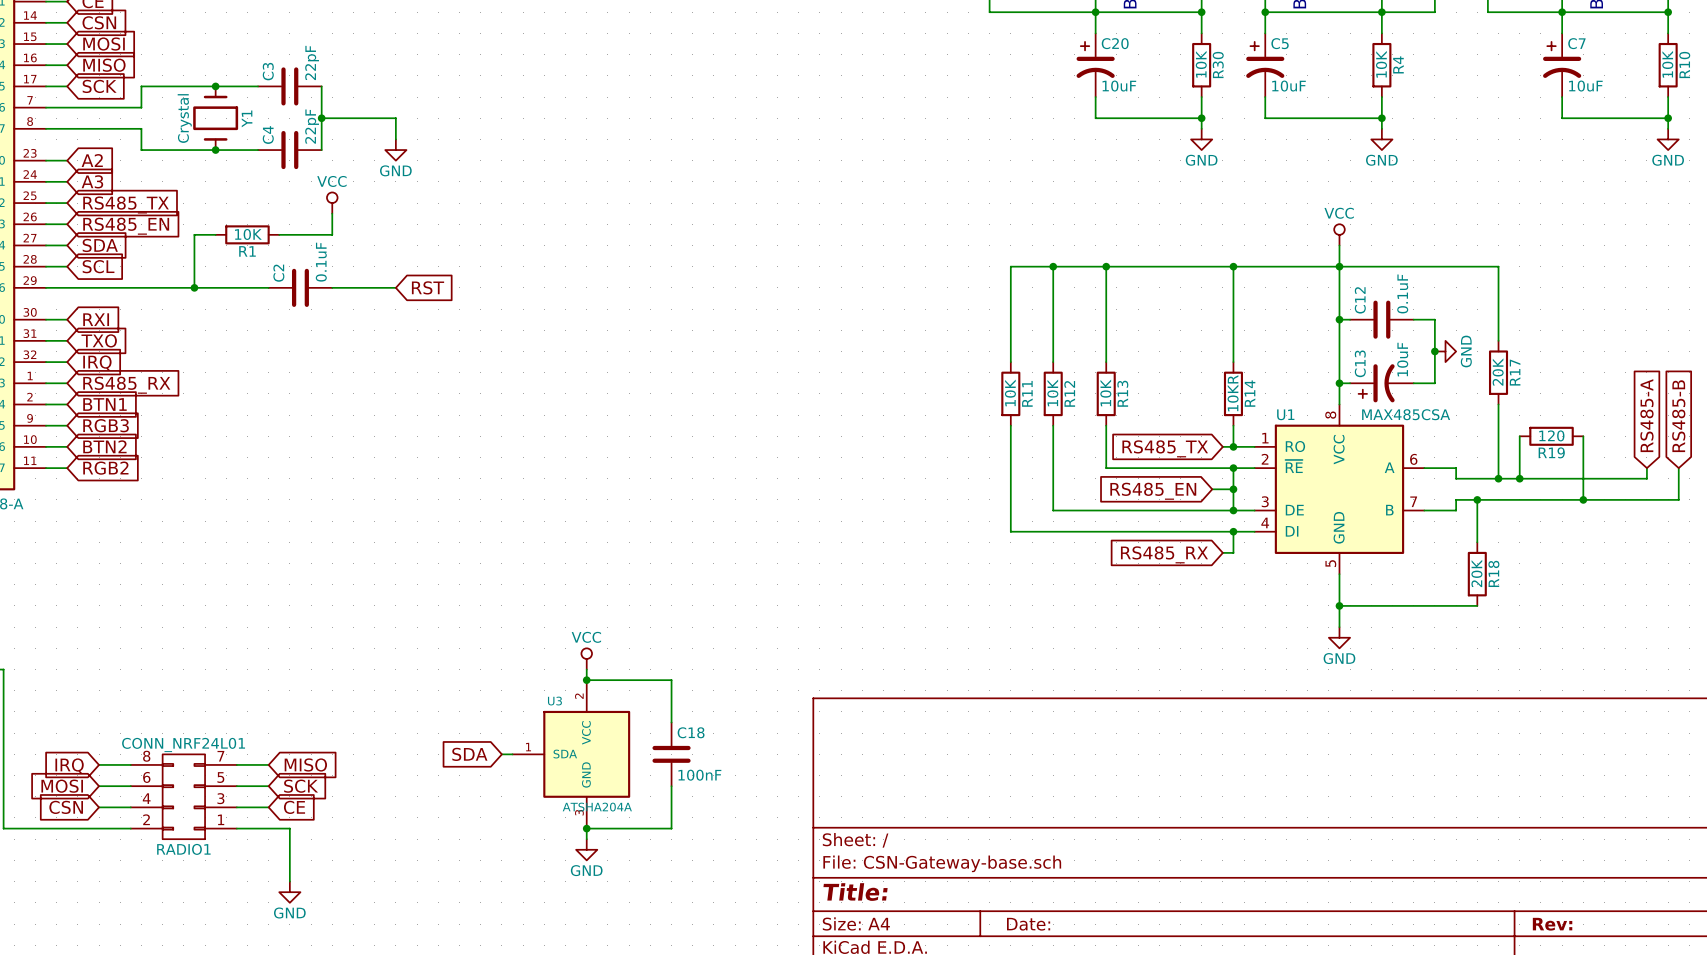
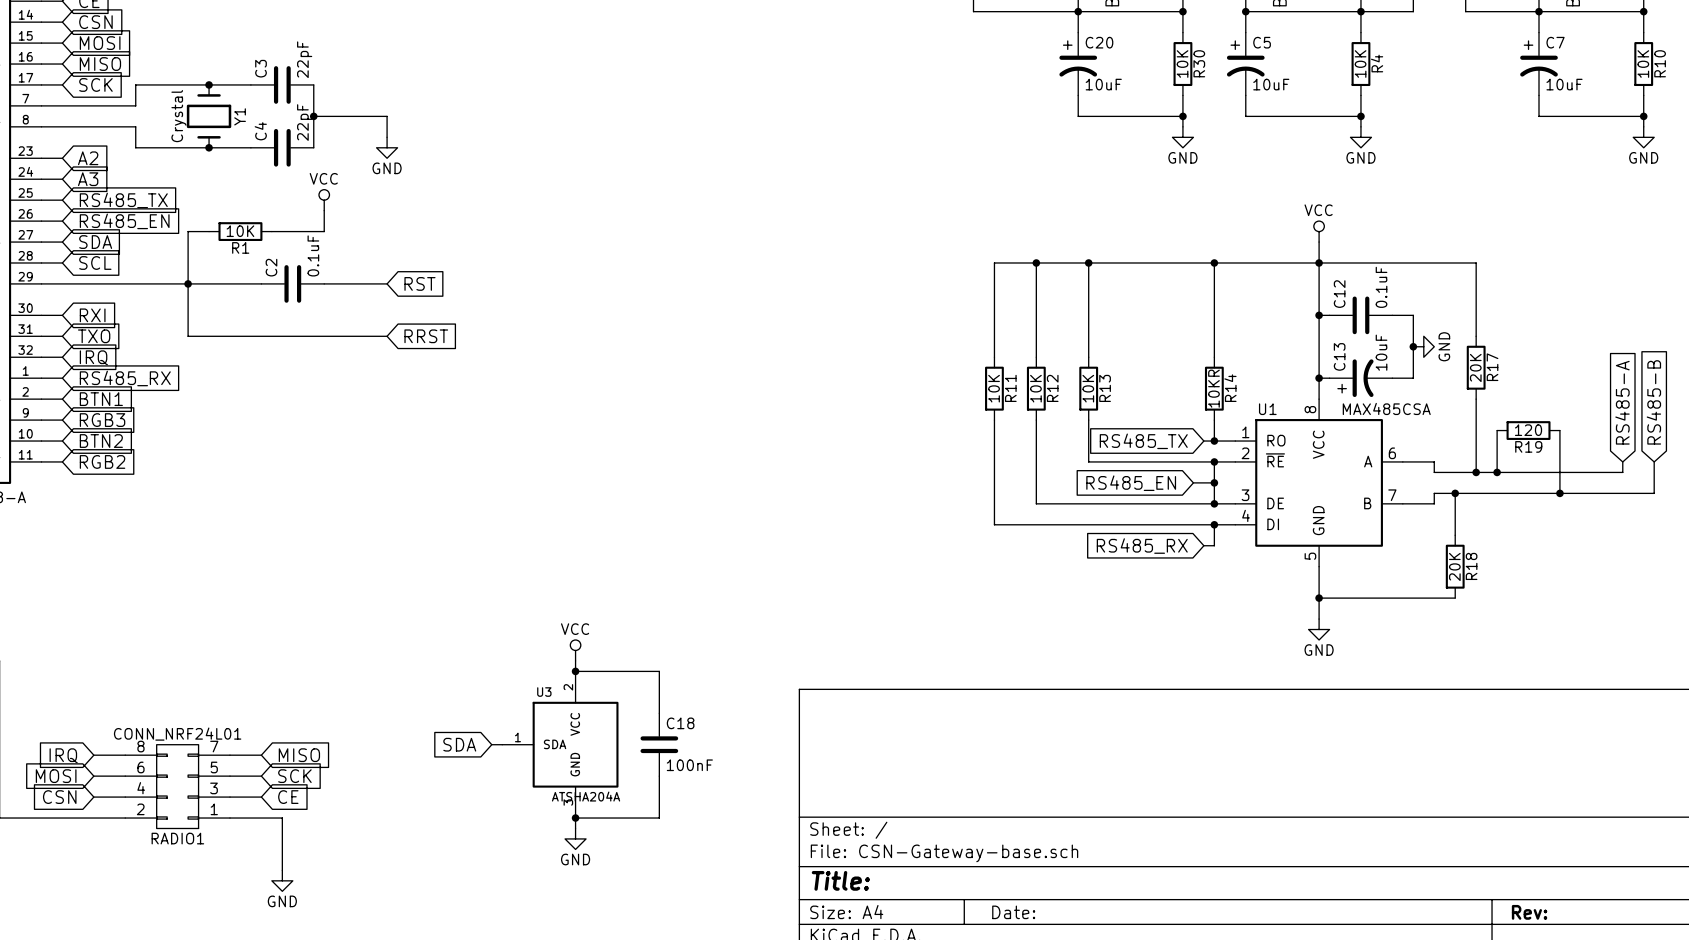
wire: none -> (188, 283) (188, 336) (387, 336)
global label: none -> RRST (426, 336)

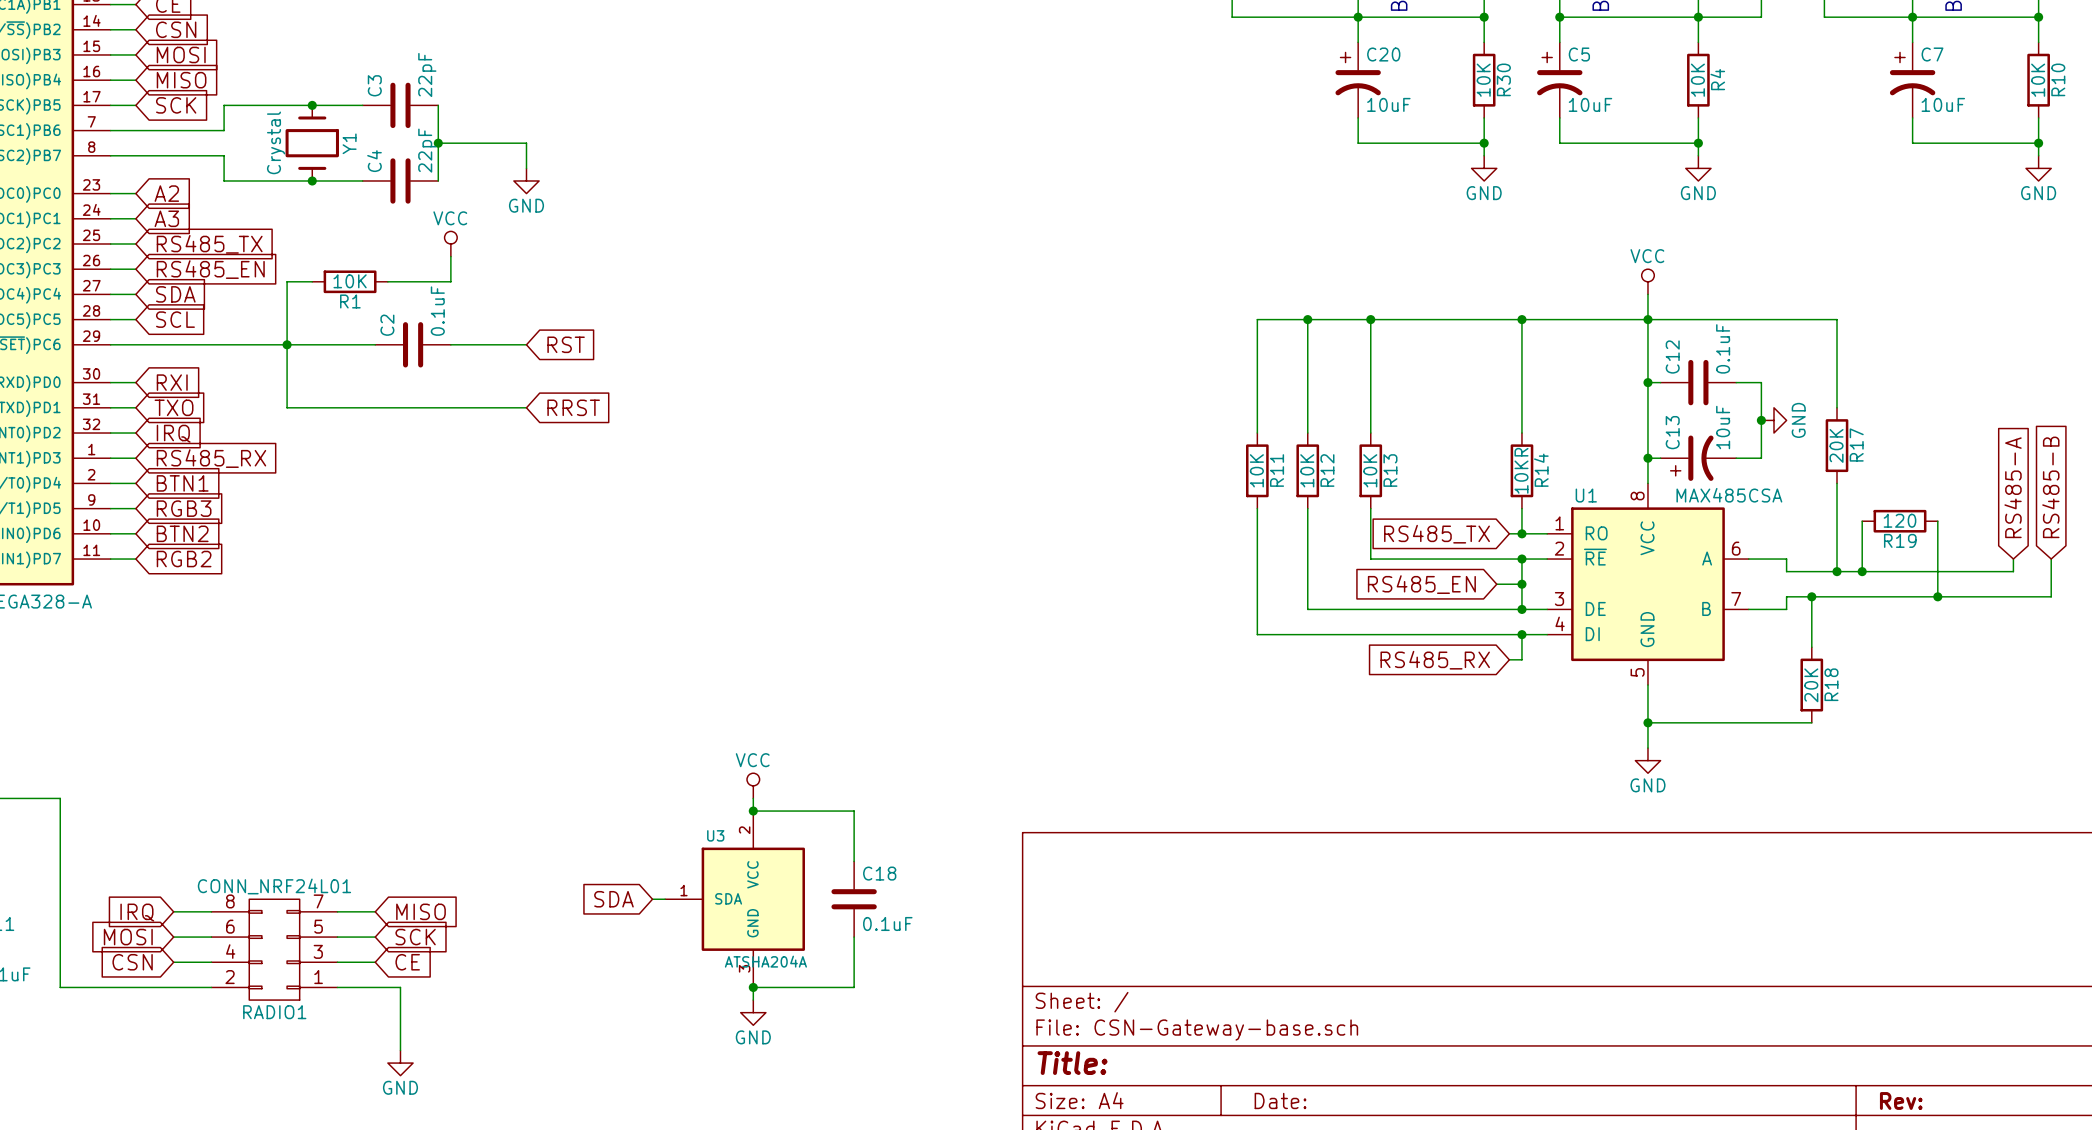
C18 value: 100nF (689, 765) -> 0.1uF (887, 923)

